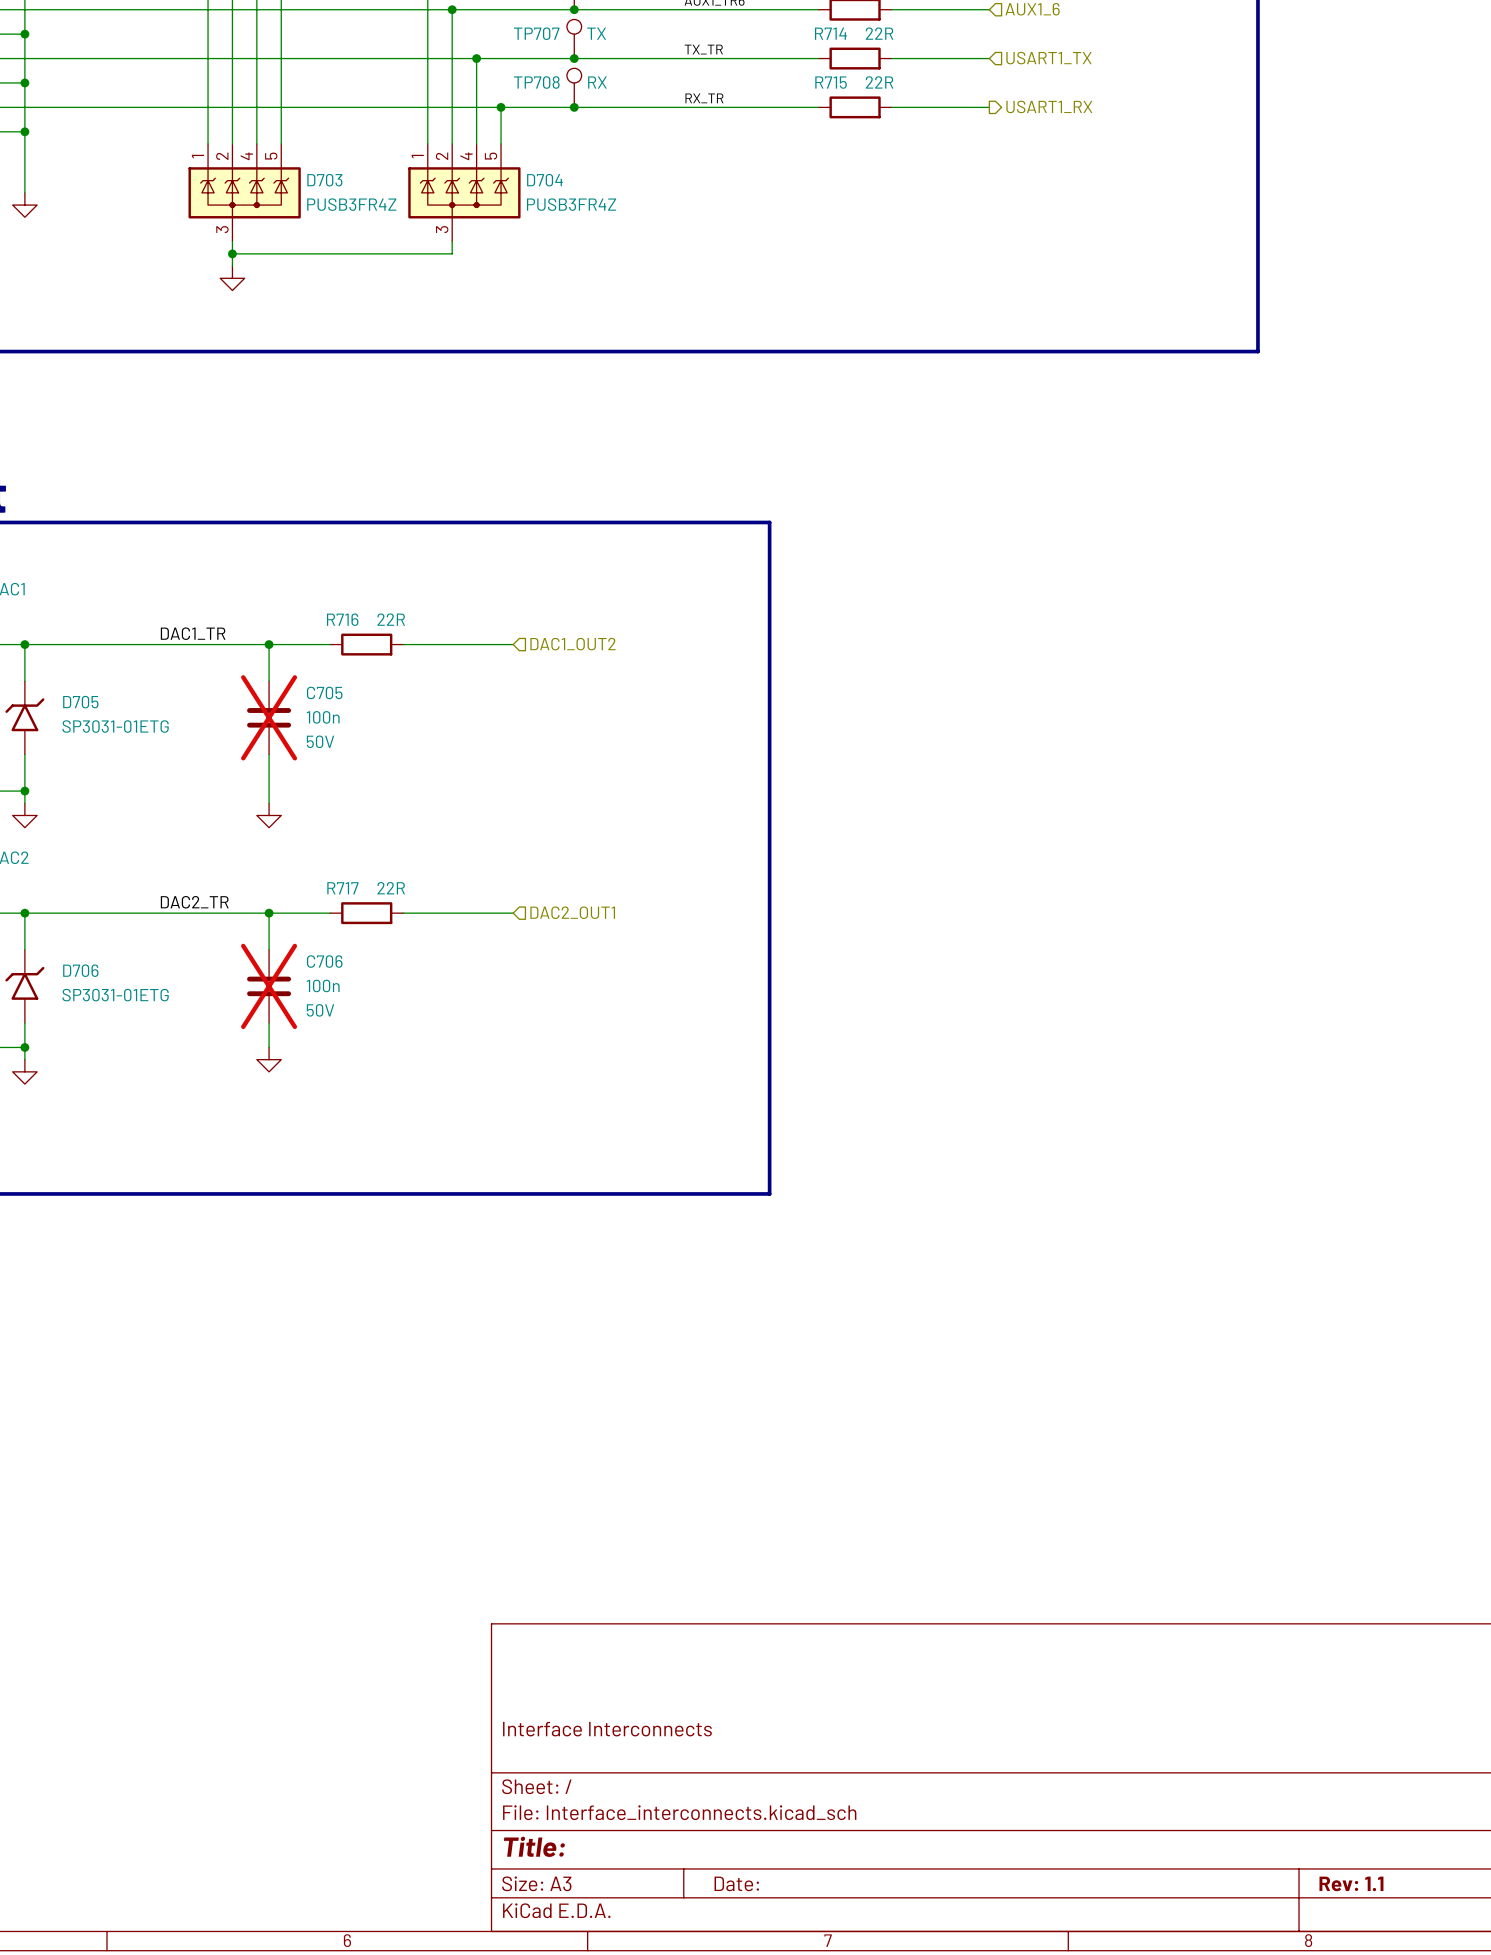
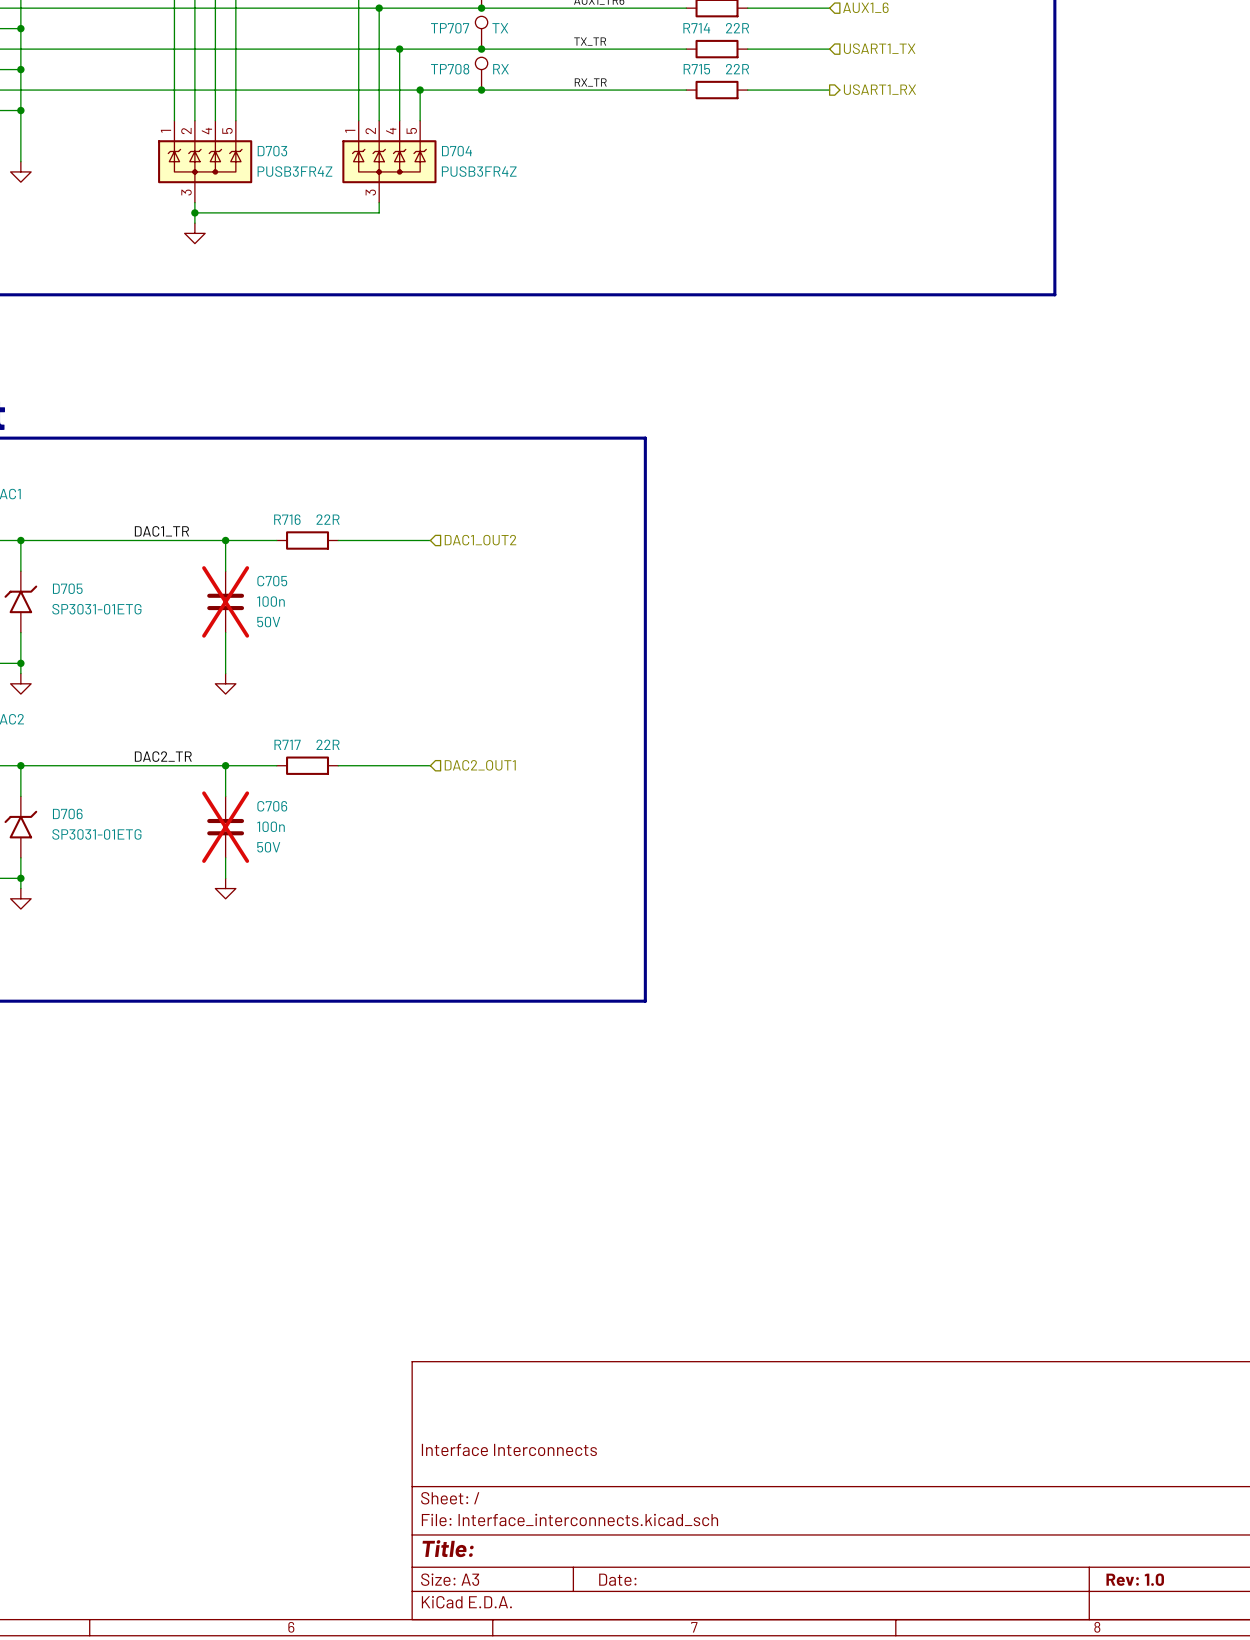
title block: Rev: 1.1 (1351, 1883) -> Rev: 1.0 (1135, 1579)

